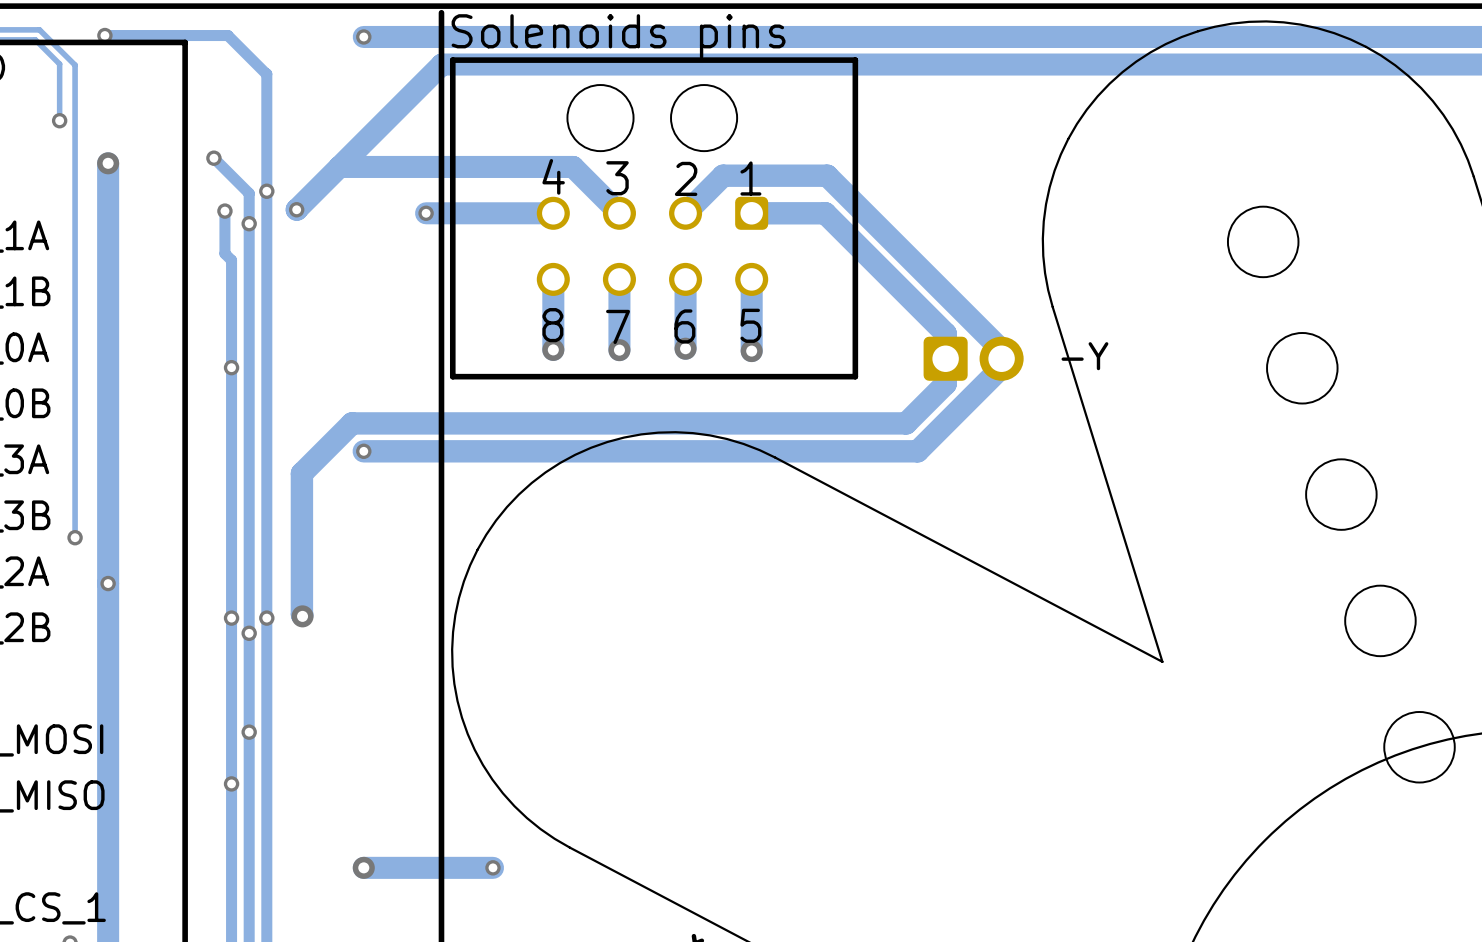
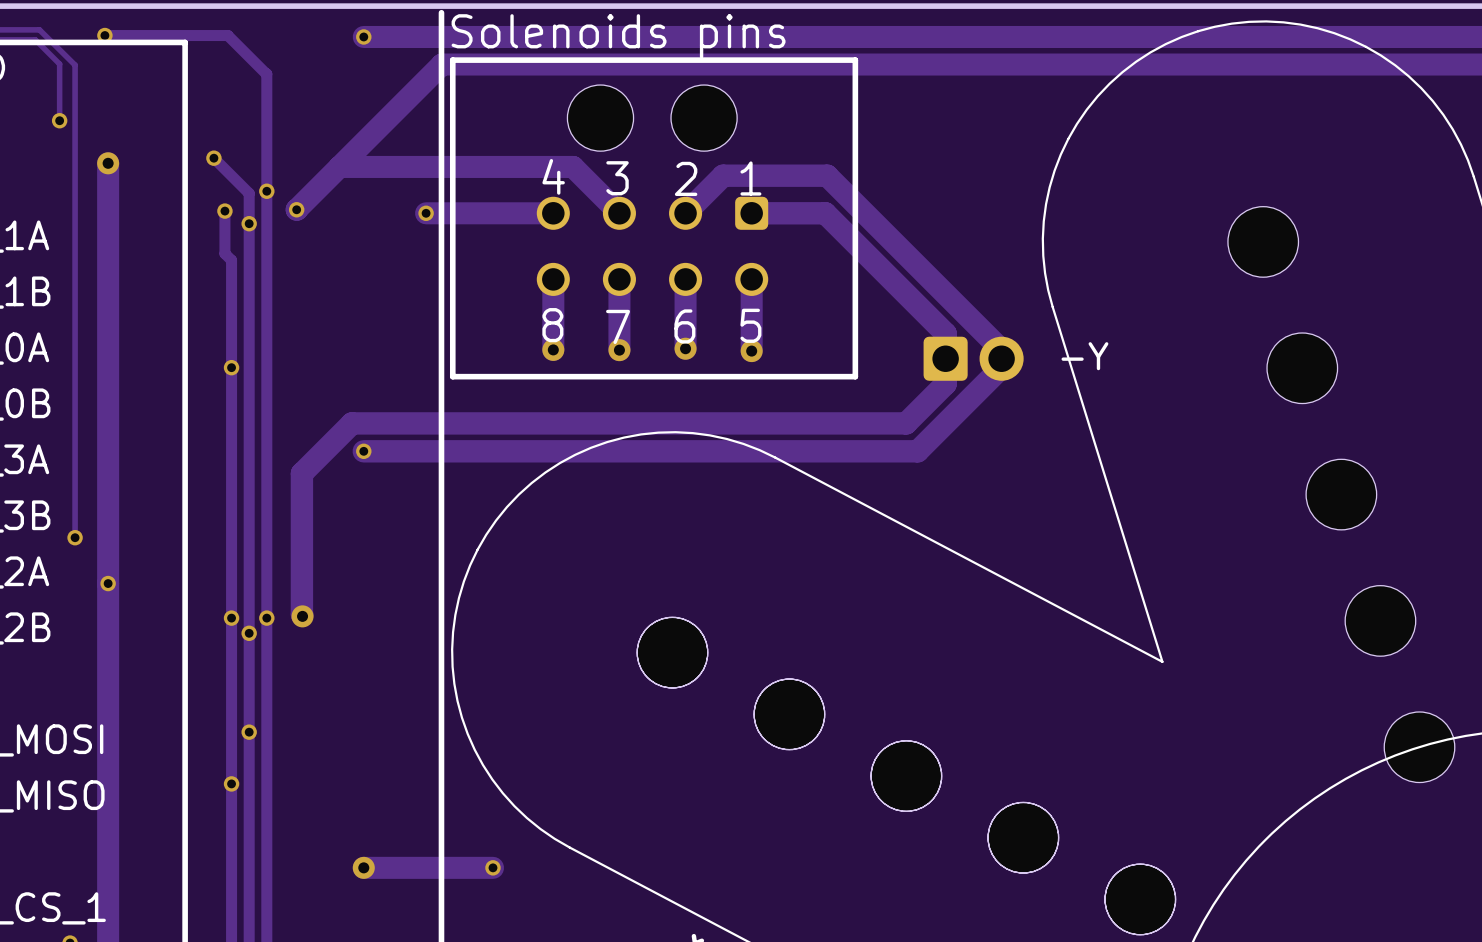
part: none -> (672, 652)
part: none -> (789, 714)
part: none -> (906, 776)
part: none -> (1023, 837)
part: none -> (1140, 899)

